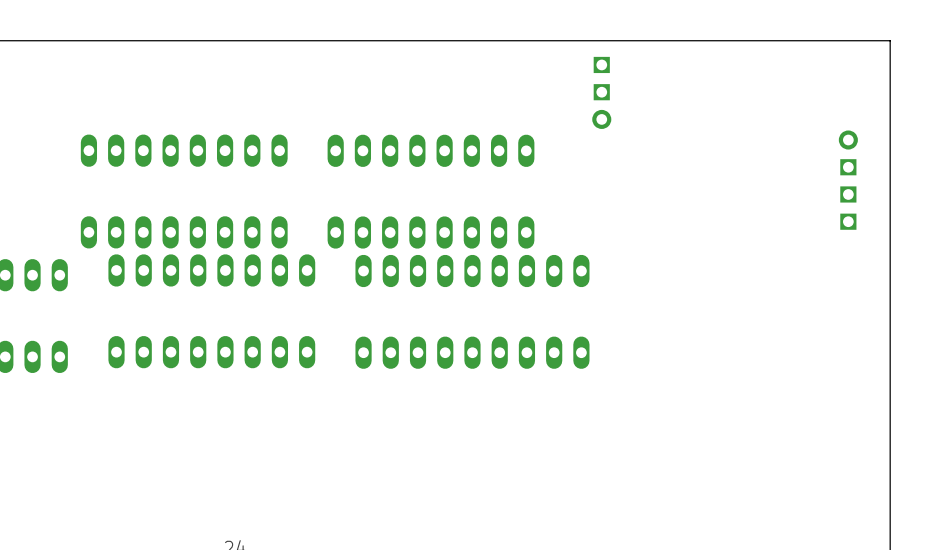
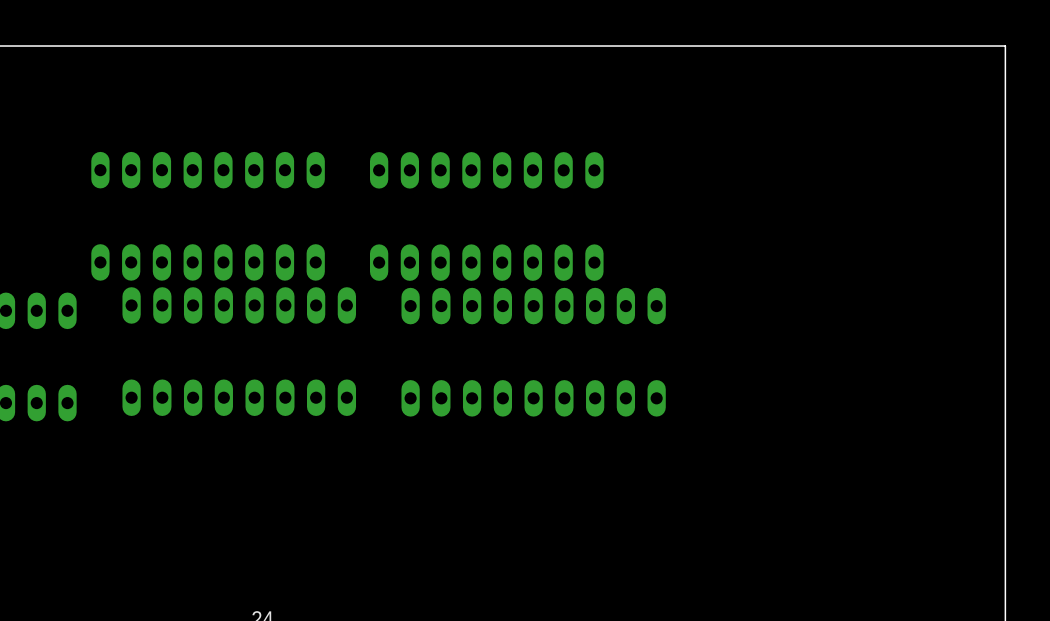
part: (601, 92) -> none
part: (848, 180) -> none

